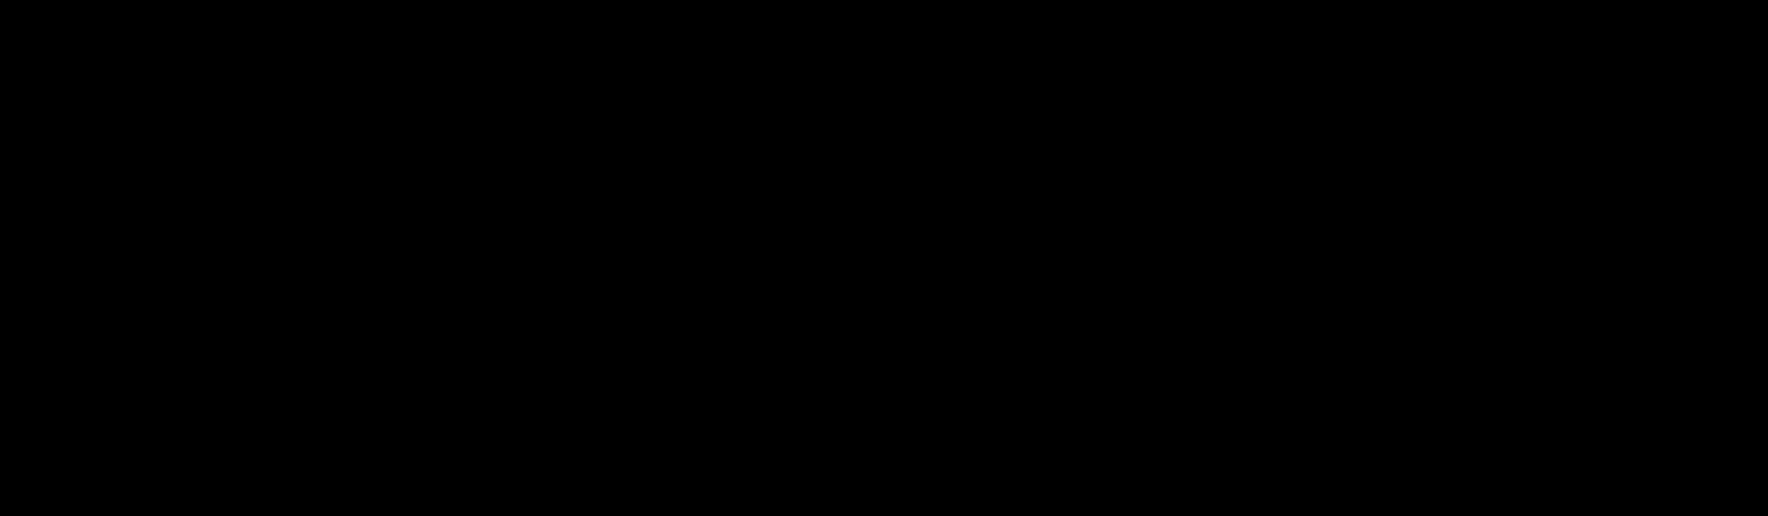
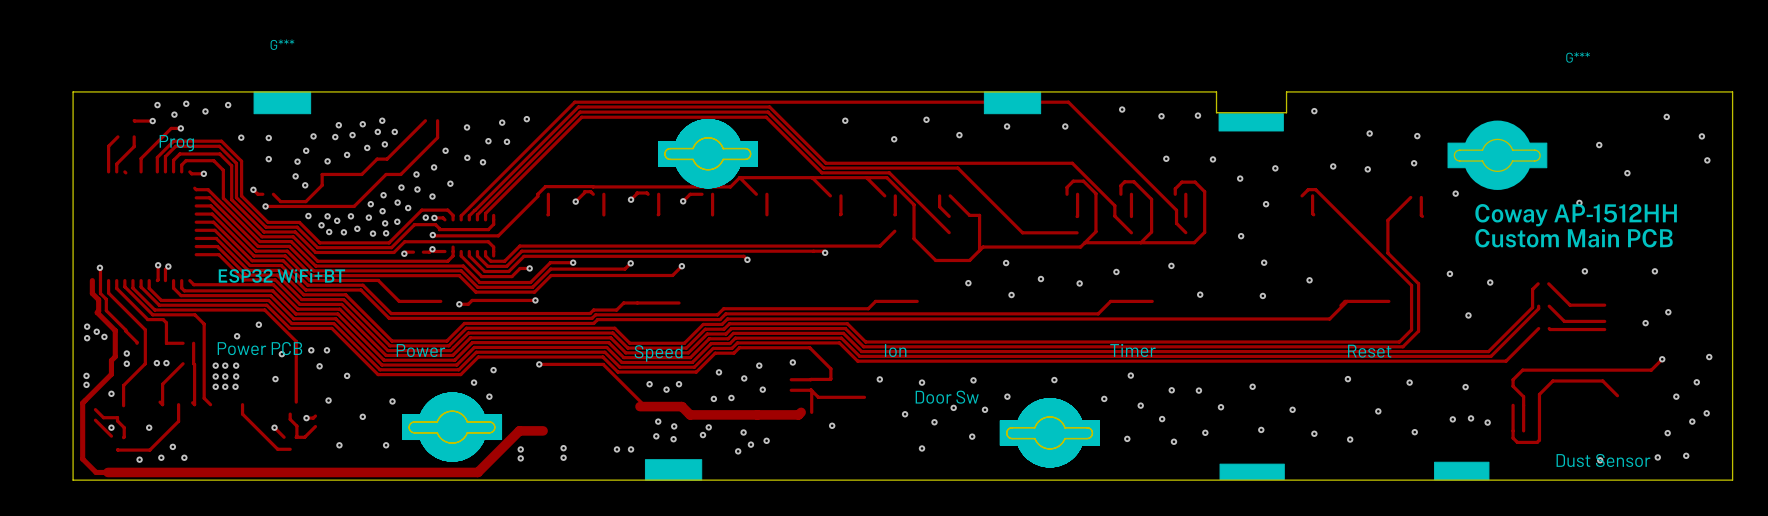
board edge: none -> (73, 91) (1216, 91) (1216, 112) (1286, 112) (1286, 91) (1732, 91) (1732, 480) (73, 480) (73, 91)
drawing: none -> [253, 91, 312, 115]
drawing: none -> [983, 91, 1042, 115]
via: none -> (186, 103)
via: none -> (157, 105)
via: none -> (228, 105)
via: none -> (1122, 109)
via: none -> (205, 111)
via: none -> (1314, 111)
drawing: none -> [1218, 113, 1284, 132]
via: none -> (174, 114)
via: none -> (1197, 115)
via: none -> (1161, 116)
via: none -> (1666, 116)
drawing: none -> [658, 118, 758, 189]
via: none -> (526, 119)
via: none -> (926, 119)
track: none -> (134, 120) (152, 121)
via: none -> (382, 120)
track: none -> (425, 120) (387, 159) (377, 159) (361, 174) (322, 174) (322, 185) (305, 201) (280, 201) (273, 194)
track: none -> (437, 120) (437, 137) (400, 174) (386, 174) (354, 206) (265, 206)
via: none -> (845, 120)
drawing: none -> [1447, 120, 1548, 190]
via: none -> (152, 121)
via: none -> (502, 122)
via: none -> (362, 124)
via: none -> (338, 125)
via: none -> (1007, 126)
via: none -> (1065, 126)
via: none -> (467, 127)
track: none -> (180, 128) (171, 128) (141, 158) (141, 171)
via: none -> (180, 128)
via: none -> (377, 131)
via: none -> (394, 131)
via: none -> (1369, 133)
via: none -> (352, 135)
via: none -> (959, 135)
track: none -> (117, 136) (108, 146) (108, 171)
track: none -> (134, 136) (134, 146) (116, 164) (116, 171)
via: none -> (313, 136)
via: none -> (1417, 136)
via: none -> (1701, 136)
via: none -> (241, 137)
via: none -> (335, 137)
via: none -> (268, 138)
via: none -> (894, 139)
via: none -> (488, 141)
via: none -> (506, 141)
text: none -> Prog (176, 143)
via: none -> (384, 144)
via: none -> (1599, 145)
via: none -> (367, 147)
board edge: none -> (670, 148) (693, 148)
board edge: none -> (670, 148) (666, 150) (664, 153) (666, 157) (670, 159)
board edge: none -> (670, 148) (666, 150) (664, 153) (666, 157) (670, 159)
board edge: none -> (693, 148) (698, 140) (708, 137) (717, 140) (723, 148)
board edge: none -> (693, 148) (698, 140) (708, 137) (717, 140) (723, 148)
board edge: none -> (745, 148) (723, 148)
board edge: none -> (745, 148) (749, 150) (750, 153) (749, 157) (745, 159)
board edge: none -> (745, 148) (749, 150) (750, 153) (749, 157) (745, 159)
via: none -> (306, 150)
via: none -> (445, 150)
board edge: none -> (1459, 150) (1482, 150) (1490, 141) (1499, 139) (1506, 142) (1512, 150) (1536, 150) (1540, 156) (1535, 160) (1512, 161) (1505, 169) (1495, 171) (1488, 168) (1482, 161) (1457, 160) (1454, 154) (1459, 150)
via: none -> (347, 154)
via: none -> (467, 157)
via: none -> (1166, 158)
via: none -> (268, 159)
board edge: none -> (670, 159) (693, 159)
board edge: none -> (693, 159) (698, 166) (708, 169) (717, 166) (723, 159)
board edge: none -> (693, 159) (698, 166) (708, 169) (717, 166) (723, 159)
board edge: none -> (723, 159) (745, 159)
via: none -> (1212, 159)
via: none -> (1707, 160)
via: none -> (297, 161)
via: none -> (327, 161)
via: none -> (483, 162)
via: none -> (1414, 163)
via: none -> (1333, 166)
via: none -> (434, 167)
via: none -> (1275, 168)
via: none -> (1367, 169)
track: none -> (124, 171) (125, 172)
track: none -> (157, 171) (157, 157) (173, 141) (221, 141) (241, 161) (241, 195) (268, 222) (299, 222) (319, 242) (389, 242) (421, 210) (447, 210) (453, 215) (453, 219)
track: none -> (165, 171) (165, 156) (175, 146) (219, 146) (236, 163) (236, 197) (266, 227) (297, 227) (317, 247) (391, 247) (414, 224) (435, 224) (439, 229) (488, 229) (493, 224) (493, 215)
track: none -> (173, 171) (173, 160) (179, 153) (219, 153) (231, 165) (231, 199) (264, 232) (295, 232) (315, 252) (393, 252) (404, 241) (488, 241) (493, 247) (493, 255)
track: none -> (181, 171) (181, 164) (185, 160) (213, 160) (223, 170) (223, 198) (262, 236) (293, 236) (317, 261) (447, 261) (453, 255) (453, 247)
track: none -> (189, 171) (191, 173) (203, 173)
via: none -> (203, 173)
via: none -> (1627, 173)
via: none -> (416, 174)
via: none -> (295, 176)
track: none -> (739, 177) (886, 177) (914, 204) (914, 238) (935, 260) (969, 260) (983, 247) (1080, 247) (1095, 231) (1095, 193) (1083, 181) (1073, 181) (1067, 187) (1067, 194)
track: none -> (739, 177) (730, 186) (545, 186) (498, 235) (432, 235)
track: none -> (739, 177) (756, 194)
track: none -> (812, 177) (830, 195)
track: none -> (866, 177) (884, 195)
via: none -> (1240, 178)
via: none -> (450, 183)
via: none -> (305, 185)
via: none -> (401, 187)
track: none -> (194, 188) (208, 189) (260, 241) (291, 241) (315, 266) (463, 266) (479, 282) (530, 282) (550, 262) (573, 262)
track: none -> (253, 189) (257, 194) (262, 194)
via: none -> (253, 189)
via: none -> (417, 189)
via: none -> (1455, 193)
track: none -> (548, 194) (547, 214)
track: none -> (593, 194) (590, 191) (584, 191) (575, 201)
track: none -> (603, 194) (603, 214)
track: none -> (648, 194) (637, 193) (631, 199)
track: none -> (658, 194) (658, 214)
track: none -> (702, 194) (690, 194) (683, 201)
track: none -> (712, 194) (712, 214)
track: none -> (766, 194) (766, 214)
track: none -> (1077, 194) (1077, 216)
track: none -> (1120, 194) (1120, 185) (1124, 181) (1134, 181) (1151, 199) (1151, 232) (1140, 242)
track: none -> (1131, 194) (1131, 216)
track: none -> (1175, 194) (1175, 188) (1181, 182) (1195, 182) (1204, 191) (1204, 232) (1194, 242) (1084, 242)
track: none -> (1185, 194) (1185, 216)
via: none -> (383, 195)
track: none -> (840, 195) (840, 214)
track: none -> (895, 195) (894, 214)
track: none -> (939, 195) (939, 206) (949, 216)
track: none -> (950, 195) (969, 215) (979, 215) (979, 250)
track: none -> (1302, 195) (1308, 189) (1315, 189) (1411, 285) (1411, 329) (1399, 342) (865, 342) (847, 323) (729, 323) (724, 329) (705, 329) (686, 348) (627, 348) (612, 333) (468, 333) (450, 350) (388, 350) (341, 304) (299, 304) (275, 279) (244, 279) (218, 254) (196, 254)
track: none -> (1312, 195) (1313, 214)
via: none -> (432, 196)
track: none -> (196, 197) (209, 197) (258, 246) (289, 246) (313, 270) (461, 270) (477, 287) (532, 287) (550, 269) (624, 269) (630, 263)
track: none -> (1410, 197) (1387, 220) (1387, 253) (1418, 283) (1418, 331) (1402, 346) (863, 346) (845, 328) (731, 328) (726, 334) (707, 334) (688, 352) (625, 352) (610, 337) (470, 337) (452, 355) (386, 355) (339, 309) (297, 309) (273, 284) (193, 284) (189, 280)
track: none -> (1421, 197) (1422, 216)
via: none -> (631, 199)
via: none -> (575, 201)
via: none -> (683, 201)
via: none -> (397, 202)
via: none -> (1579, 202)
via: none -> (370, 204)
via: none -> (1266, 204)
track: none -> (196, 205) (210, 205) (256, 251) (287, 251) (311, 275) (459, 275) (475, 292) (534, 292) (551, 275) (672, 275) (681, 266)
via: none -> (265, 206)
via: none -> (408, 208)
via: none -> (382, 211)
track: none -> (196, 214) (212, 214) (254, 255) (285, 255) (309, 280) (378, 280) (399, 301) (440, 301)
via: none -> (308, 216)
via: none -> (327, 216)
via: none -> (350, 216)
via: none -> (368, 217)
via: none -> (425, 217)
track: none -> (434, 217) (443, 217) (444, 219)
via: none -> (434, 217)
track: none -> (461, 219) (461, 215) (574, 102) (1068, 102) (1176, 210) (1176, 223) (1185, 232)
track: none -> (469, 219) (469, 215) (578, 106) (769, 106) (825, 163) (1072, 163) (1114, 205) (1114, 216) (1131, 232)
track: none -> (477, 219) (477, 214) (580, 112) (767, 112) (823, 168) (957, 168) (1022, 232) (1077, 232)
track: none -> (485, 219) (485, 213) (581, 117) (766, 117) (821, 172) (889, 172) (949, 232)
via: none -> (337, 220)
via: none -> (397, 221)
track: none -> (196, 222) (213, 222) (252, 260) (283, 260) (307, 285) (362, 285) (391, 313) (590, 313) (593, 310) (616, 310) (623, 302) (679, 302)
via: none -> (385, 223)
via: none -> (321, 225)
G***: none -> (1576, 225)
via: none -> (357, 228)
track: none -> (196, 230) (214, 230) (250, 265) (281, 265) (305, 290) (360, 290) (389, 318) (592, 318) (595, 314) (717, 314) (723, 308) (868, 308) (875, 301) (917, 301)
track: none -> (894, 231) (879, 246) (519, 246) (504, 261) (490, 261) (485, 255) (485, 251)
via: none -> (329, 232)
via: none -> (343, 232)
via: none -> (373, 233)
via: none -> (386, 233)
via: none -> (432, 235)
via: none -> (1241, 236)
track: none -> (196, 238) (216, 238) (248, 270) (279, 270) (303, 294) (345, 294) (392, 341) (446, 341) (464, 323) (593, 323) (597, 319) (720, 319) (725, 313) (1098, 313) (1110, 301) (1152, 301)
track: none -> (196, 246) (217, 246) (246, 275) (277, 275) (301, 299) (343, 299) (390, 345) (448, 345) (466, 328) (614, 328) (629, 343) (684, 343) (703, 324) (722, 324) (727, 318) (1329, 318) (1347, 301)
via: none -> (432, 249)
track: none -> (444, 251) (434, 251) (432, 249) (429, 252) (423, 252)
track: none -> (461, 251) (461, 255) (481, 276) (511, 276) (520, 268) (529, 268)
track: none -> (469, 251) (469, 255) (484, 271) (508, 271) (524, 256) (743, 256) (747, 259)
track: none -> (477, 251) (477, 255) (487, 266) (506, 266) (521, 251) (823, 251) (825, 252)
track: none -> (413, 252) (404, 253)
via: none -> (825, 252)
via: none -> (404, 253)
via: none -> (747, 259)
via: none -> (573, 262)
via: none -> (1264, 262)
via: none -> (630, 263)
via: none -> (1006, 263)
track: none -> (158, 265) (157, 280)
via: none -> (158, 265)
via: none -> (1171, 265)
track: none -> (168, 266) (165, 269) (165, 280)
via: none -> (168, 266)
via: none -> (681, 266)
track: none -> (99, 267) (100, 293) (106, 299) (106, 310) (137, 343)
via: none -> (99, 267)
via: none -> (529, 268)
via: none -> (1116, 271)
via: none -> (1584, 271)
via: none -> (1654, 271)
via: none -> (1449, 273)
G***: none -> (281, 275)
via: none -> (1040, 279)
track: none -> (92, 280) (92, 293) (98, 299) (97, 312) (115, 330) (115, 356) (111, 360) (111, 374) (82, 403) (82, 459) (96, 472) (477, 472) (519, 430) (543, 430)
track: none -> (108, 280) (108, 293) (145, 329) (145, 363) (123, 385) (123, 405)
track: none -> (116, 280) (116, 288) (147, 319) (163, 319) (166, 322) (166, 343) (183, 343)
track: none -> (124, 280) (124, 286) (152, 314) (194, 314) (204, 324) (204, 398) (210, 404)
track: none -> (132, 280) (132, 288) (154, 310) (264, 310) (296, 341) (296, 402)
track: none -> (141, 280) (141, 286) (159, 305) (266, 305) (289, 328) (331, 328) (378, 374) (460, 374) (478, 357) (602, 357) (617, 372) (696, 372) (715, 353) (733, 353) (739, 347) (809, 347) (830, 368) (830, 379) (791, 379)
track: none -> (149, 280) (149, 288) (161, 300) (268, 300) (291, 323) (333, 323) (380, 369) (458, 369) (476, 352) (604, 352) (619, 367) (694, 367) (713, 348) (731, 348) (737, 342) (839, 342) (857, 361) (1506, 361) (1538, 328)
track: none -> (173, 280) (173, 288) (181, 295) (270, 295) (293, 318) (335, 318) (382, 365) (456, 365) (474, 347) (606, 347) (621, 362) (692, 362) (711, 343) (729, 343) (735, 338) (841, 338) (859, 356) (1490, 356) (1538, 308) (1538, 306)
track: none -> (181, 280) (181, 288) (184, 290) (272, 290) (295, 313) (337, 313) (384, 360) (454, 360) (472, 342) (608, 342) (623, 357) (690, 357) (709, 338) (728, 338) (733, 333) (843, 333) (861, 351) (1488, 351) (1532, 307) (1532, 289) (1538, 283)
via: none -> (1309, 280)
via: none -> (1490, 282)
via: none -> (968, 283)
via: none -> (1079, 283)
track: none -> (1548, 283) (1570, 305) (1604, 305)
via: none -> (1200, 294)
via: none -> (1011, 295)
via: none -> (1262, 295)
track: none -> (535, 300) (472, 300) (468, 304) (459, 304)
via: none -> (535, 300)
track: none -> (1388, 301) (1345, 301) (1340, 305)
via: none -> (459, 304)
track: none -> (1549, 306) (1564, 321) (1604, 321)
via: none -> (1668, 312)
via: none -> (1468, 315)
via: none -> (1645, 323)
via: none -> (258, 324)
via: none -> (87, 326)
track: none -> (1549, 328) (1604, 329)
via: none -> (96, 331)
via: none -> (104, 336)
via: none -> (237, 336)
via: none -> (87, 338)
track: none -> (193, 343) (194, 404) (192, 402)
text: none -> Power PCB (259, 348)
via: none -> (311, 350)
via: none -> (326, 350)
text: none -> Power (420, 350)
text: none -> Ion (895, 350)
text: none -> Timer (1132, 350)
text: none -> Reset (1369, 351)
via: none -> (126, 353)
text: none -> Speed (658, 353)
via: none -> (281, 354)
via: none -> (1709, 357)
track: none -> (1662, 359) (1651, 370) (1522, 370) (1513, 379) (1513, 386) (1523, 396) (1523, 430)
via: none -> (1662, 359)
via: none -> (792, 362)
via: none -> (126, 363)
via: none -> (156, 363)
via: none -> (166, 363)
track: none -> (183, 363) (162, 384) (162, 404) (160, 402)
track: none -> (539, 364) (603, 364) (645, 406) (681, 406)
via: none -> (539, 364)
via: none -> (215, 365)
via: none -> (225, 365)
via: none -> (236, 365)
via: none -> (759, 365)
via: none -> (319, 366)
via: none -> (493, 370)
via: none -> (718, 372)
via: none -> (86, 375)
via: none -> (347, 375)
via: none -> (1130, 375)
via: none -> (215, 376)
via: none -> (225, 376)
via: none -> (236, 376)
via: none -> (744, 378)
via: none -> (275, 379)
via: none -> (879, 379)
via: none -> (1347, 379)
via: none -> (973, 380)
via: none -> (1054, 380)
via: none -> (474, 382)
via: none -> (922, 382)
via: none -> (1409, 382)
via: none -> (1696, 382)
via: none -> (86, 384)
via: none -> (649, 384)
via: none -> (679, 384)
via: none -> (215, 386)
via: none -> (225, 386)
via: none -> (235, 386)
via: none -> (1252, 386)
via: none -> (1465, 387)
via: none -> (666, 389)
via: none -> (762, 389)
track: none -> (791, 390) (811, 389) (818, 397) (864, 397)
track: none -> (811, 390) (811, 412)
via: none -> (1171, 390)
via: none -> (1198, 390)
drawing: none -> [402, 392, 503, 462]
via: none -> (111, 393)
track: none -> (1617, 395) (1602, 381) (1552, 381) (1539, 394) (1539, 440) (1537, 442) (1517, 442) (1513, 438) (1513, 405)
via: none -> (489, 396)
via: none -> (1007, 396)
via: none -> (1676, 396)
via: none -> (731, 397)
text: none -> Door Sw (947, 397)
via: none -> (713, 398)
drawing: none -> [999, 398, 1100, 468]
via: none -> (1104, 398)
via: none -> (328, 400)
via: none -> (392, 401)
track: none -> (178, 404) (178, 421) (149, 450) (117, 449)
track: none -> (242, 404) (242, 414) (277, 449) (290, 449)
via: none -> (1140, 405)
track: none -> (640, 406) (681, 406)
track: none -> (681, 406) (690, 414) (798, 414) (801, 412)
via: none -> (953, 407)
via: none -> (1220, 407)
track: none -> (95, 409) (103, 417) (117, 417) (117, 420) (124, 427) (123, 437)
via: none -> (985, 409)
via: none -> (1292, 409)
via: none -> (1378, 411)
via: none -> (1706, 413)
track: none -> (290, 414) (290, 419) (296, 426) (296, 437) (304, 437) (315, 426)
via: none -> (905, 414)
track: none -> (315, 416) (313, 418) (306, 418)
via: none -> (362, 416)
via: none -> (306, 418)
via: none -> (1471, 418)
via: none -> (1162, 419)
via: none -> (1452, 419)
track: none -> (95, 420) (111, 436)
board edge: none -> (414, 421) (437, 421)
board edge: none -> (414, 421) (410, 423) (409, 427) (410, 431) (414, 432)
board edge: none -> (414, 421) (410, 423) (409, 427) (410, 431) (414, 432)
board edge: none -> (437, 421) (443, 414) (452, 411) (461, 414) (467, 422)
board edge: none -> (437, 421) (443, 414) (452, 411) (461, 414) (467, 422)
board edge: none -> (489, 421) (467, 422)
board edge: none -> (489, 421) (493, 423) (494, 427) (493, 431) (489, 432)
board edge: none -> (489, 421) (493, 423) (494, 427) (493, 431) (489, 432)
via: none -> (658, 421)
via: none -> (1692, 421)
via: none -> (934, 422)
via: none -> (1487, 422)
via: none -> (832, 425)
via: none -> (674, 426)
via: none -> (111, 427)
via: none -> (149, 427)
track: none -> (274, 427) (284, 437)
via: none -> (274, 427)
via: none -> (708, 427)
board edge: none -> (1012, 427) (1034, 427)
board edge: none -> (1012, 427) (1008, 429) (1006, 433) (1008, 436) (1012, 438)
board edge: none -> (1012, 427) (1008, 429) (1006, 433) (1008, 436) (1012, 438)
board edge: none -> (1034, 427) (1040, 419) (1049, 416) (1059, 419) (1064, 427)
board edge: none -> (1034, 427) (1040, 419) (1049, 416) (1059, 419) (1064, 427)
board edge: none -> (1087, 427) (1064, 427)
board edge: none -> (1087, 427) (1091, 429) (1092, 433) (1090, 437) (1087, 438)
board edge: none -> (1087, 427) (1091, 429) (1092, 433) (1090, 437) (1087, 438)
via: none -> (1261, 429)
board edge: none -> (414, 432) (437, 432)
board edge: none -> (437, 432) (443, 440) (452, 443) (461, 440) (467, 432)
board edge: none -> (437, 432) (443, 440) (452, 443) (461, 440) (467, 432)
board edge: none -> (467, 432) (489, 432)
via: none -> (743, 432)
via: none -> (1205, 432)
via: none -> (1414, 432)
via: none -> (1314, 433)
via: none -> (1667, 433)
via: none -> (702, 435)
via: none -> (656, 436)
via: none -> (972, 436)
board edge: none -> (1012, 438) (1034, 438)
board edge: none -> (1034, 438) (1040, 446) (1049, 448) (1059, 446) (1064, 438)
board edge: none -> (1034, 438) (1040, 446) (1049, 448) (1059, 446) (1064, 438)
board edge: none -> (1064, 438) (1087, 438)
via: none -> (1127, 438)
via: none -> (673, 439)
via: none -> (1350, 439)
via: none -> (766, 440)
via: none -> (1173, 441)
via: none -> (750, 444)
via: none -> (339, 445)
via: none -> (386, 445)
via: none -> (172, 446)
via: none -> (563, 448)
via: none -> (922, 448)
via: none -> (520, 449)
via: none -> (616, 449)
via: none -> (631, 449)
via: none -> (738, 451)
via: none -> (1686, 455)
via: none -> (161, 457)
via: none -> (184, 457)
via: none -> (563, 457)
via: none -> (1657, 457)
via: none -> (520, 458)
via: none -> (139, 459)
drawing: none -> [644, 459, 703, 481]
via: none -> (1600, 460)
text: none -> Dust Sensor (1603, 460)
drawing: none -> [1434, 461, 1490, 481]
drawing: none -> [1219, 463, 1285, 480]

